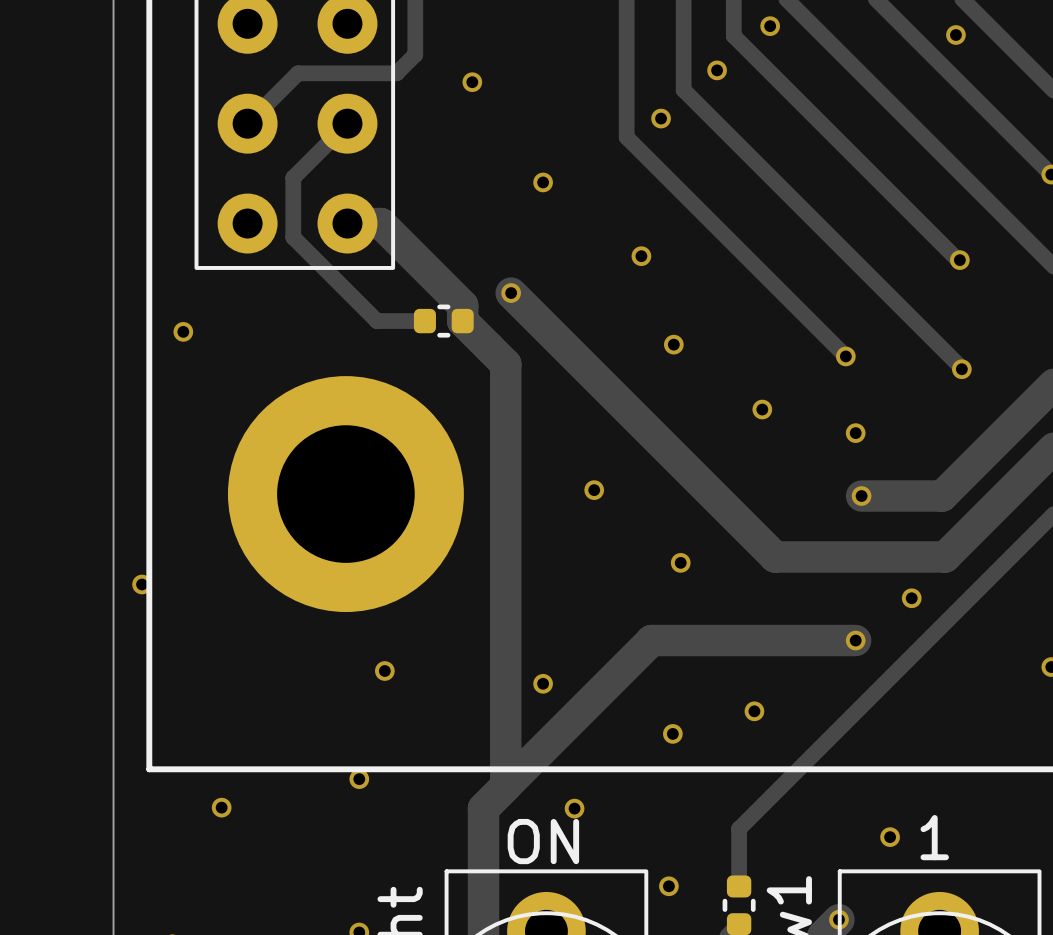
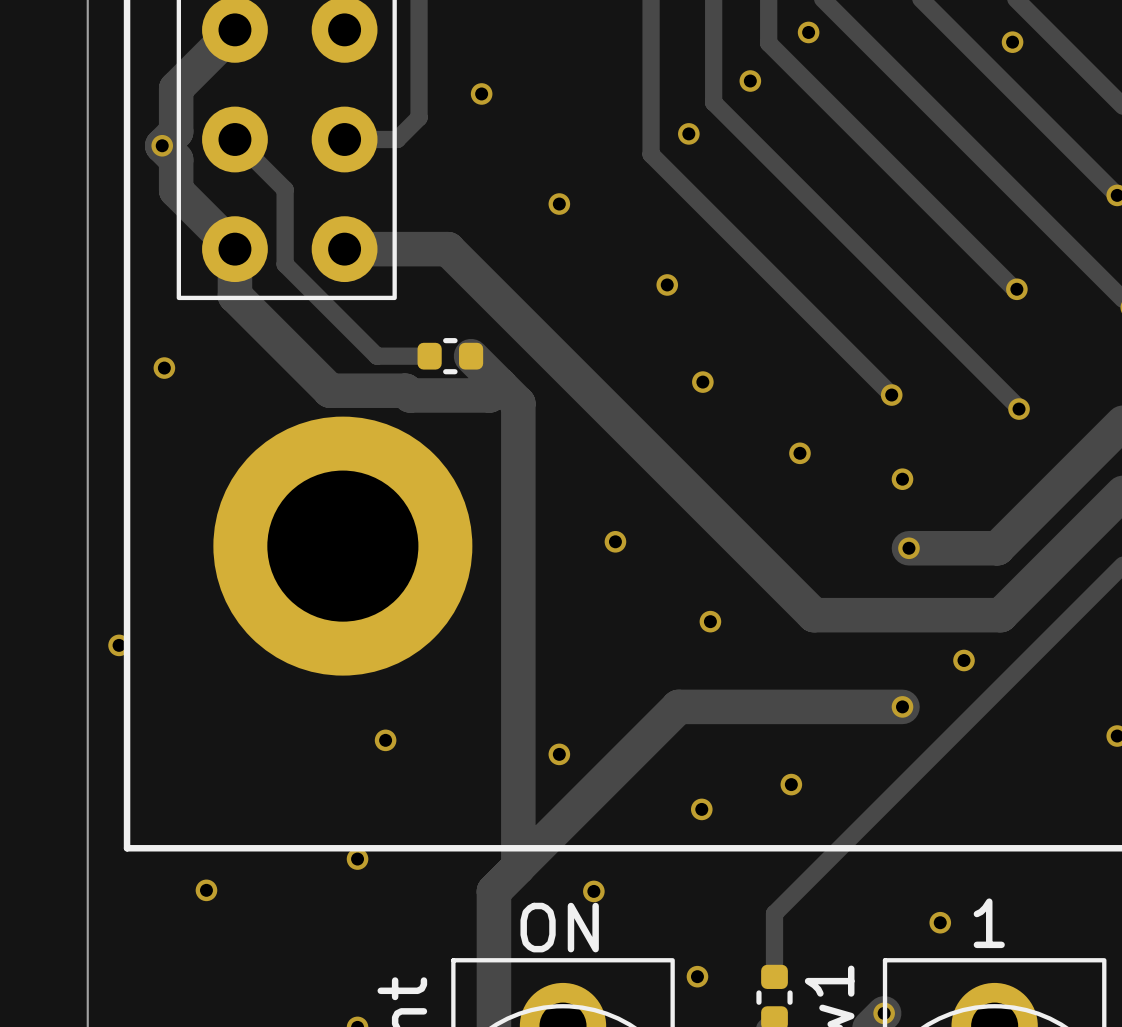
track: none -> (234, 29) (176, 88) (176, 131) (162, 145) (176, 159) (176, 190) (234, 249) (234, 295) (330, 390) (405, 390) (410, 395) (489, 395) (499, 385)
track: (415, 54) (396, 73) (297, 73) (247, 123) -> (419, 63) (419, 117) (397, 139) (344, 139)
track: (347, 123) (293, 177) -> (234, 139) (285, 189) (285, 198)
via: none -> (162, 145)
track: (380, 223) (462, 305) (462, 321) -> (381, 249) (447, 249) (524, 325)
via: (511, 293) -> none

